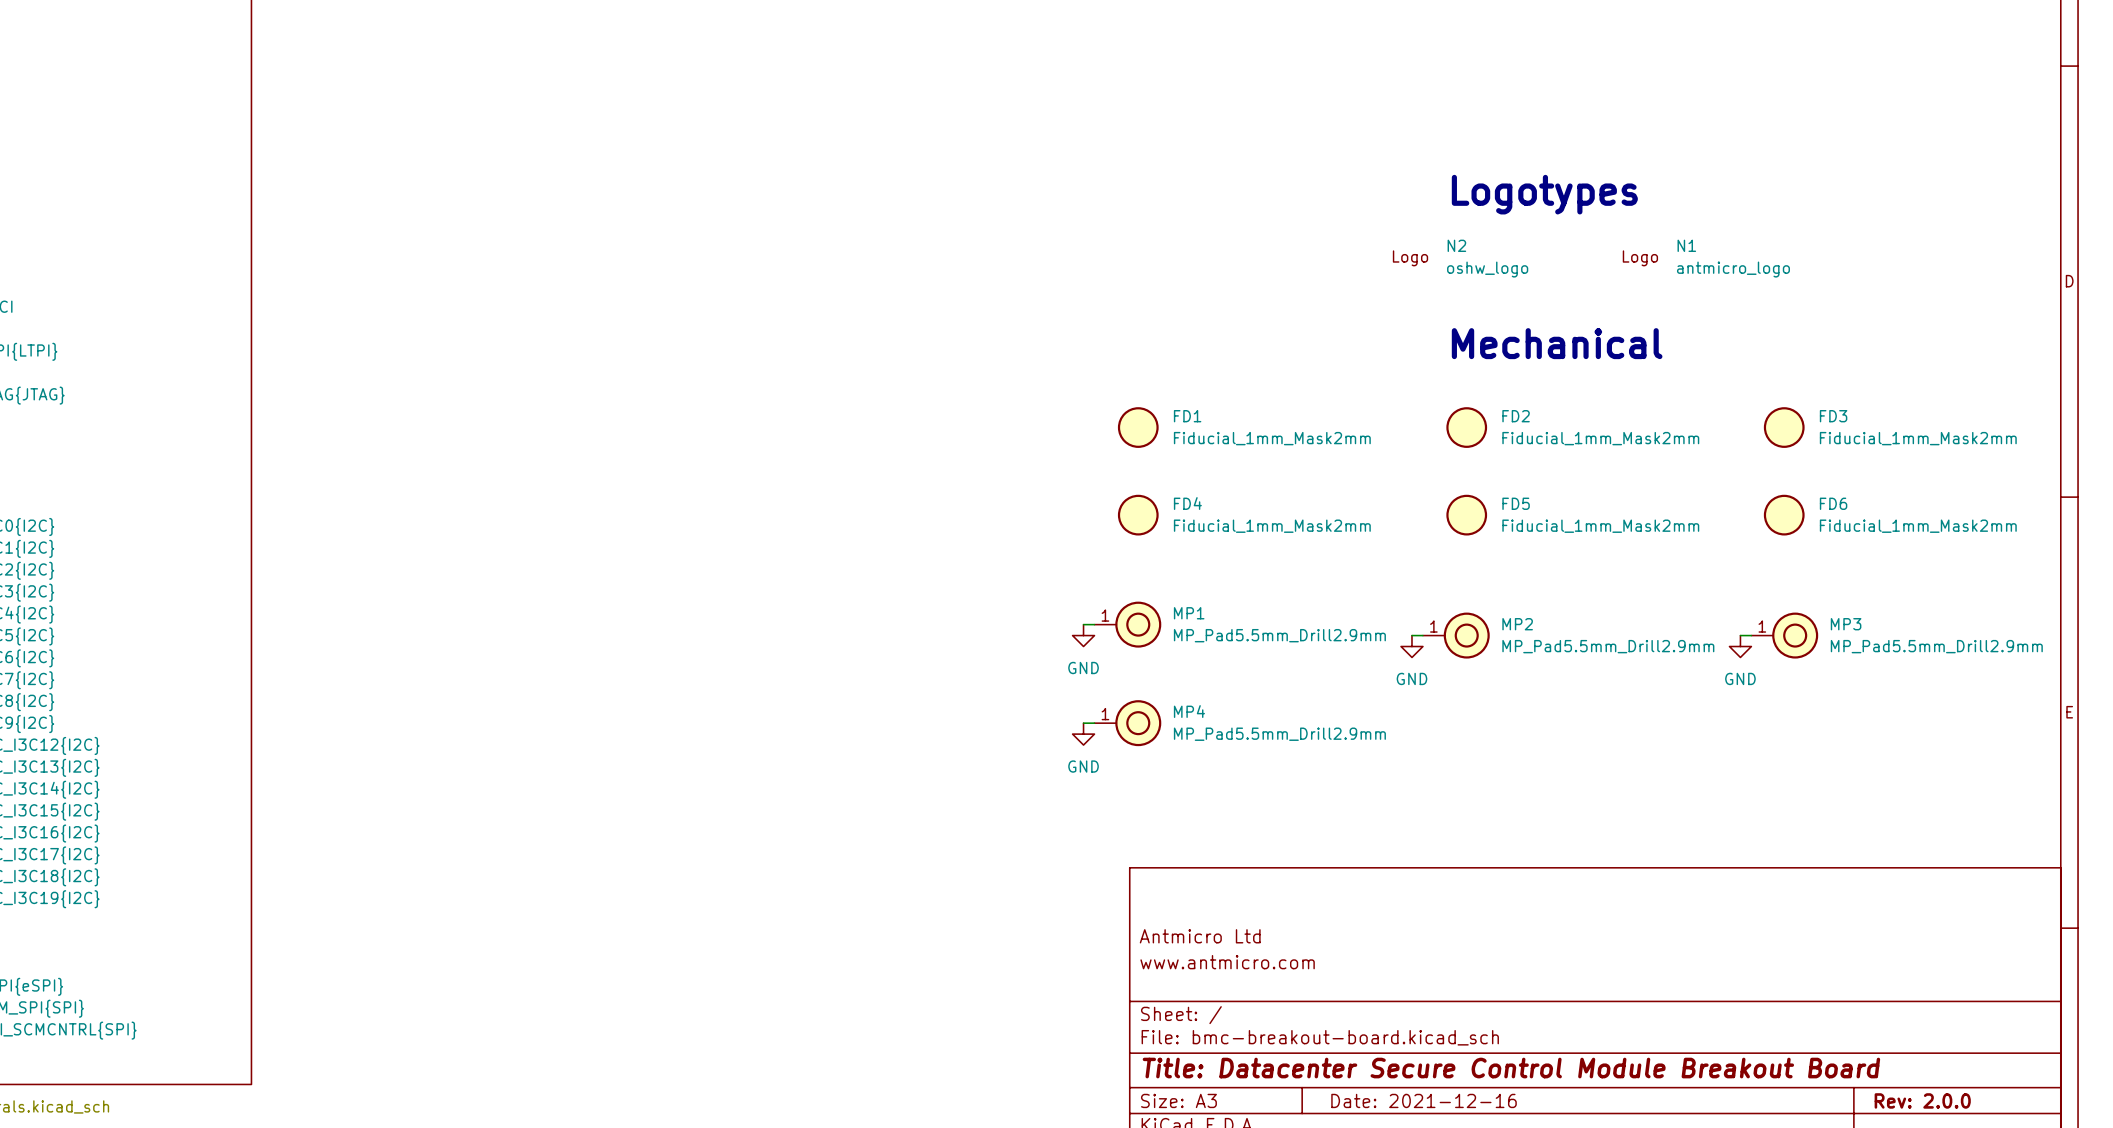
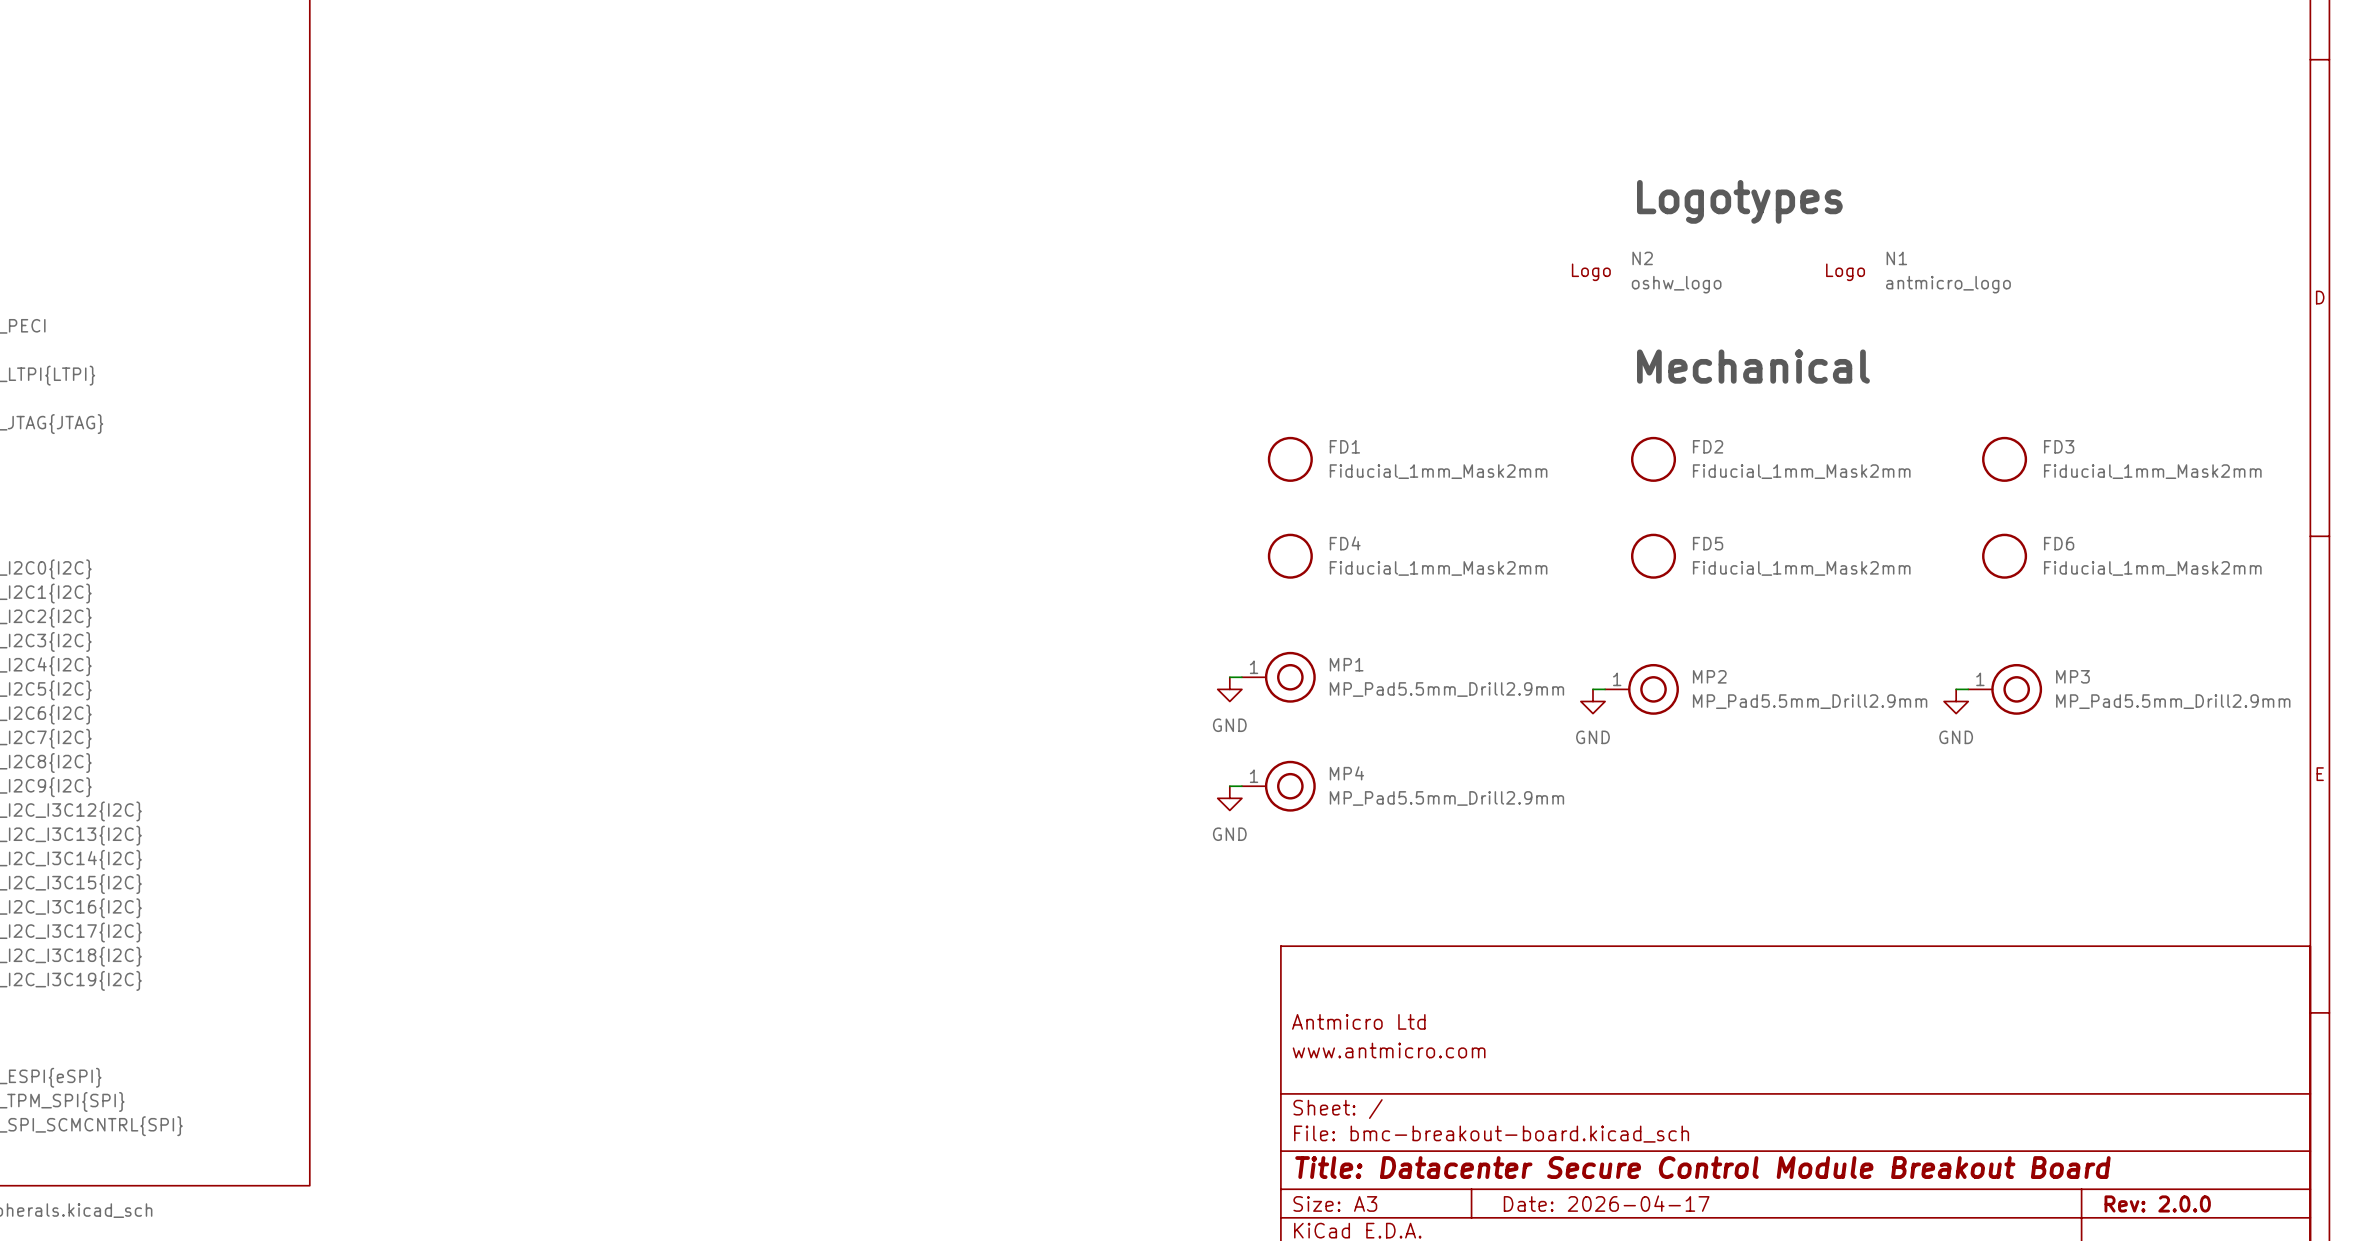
title block: Date: 2021-12-16 (1424, 1100) -> Date: 2026-04-17 (1606, 1203)

